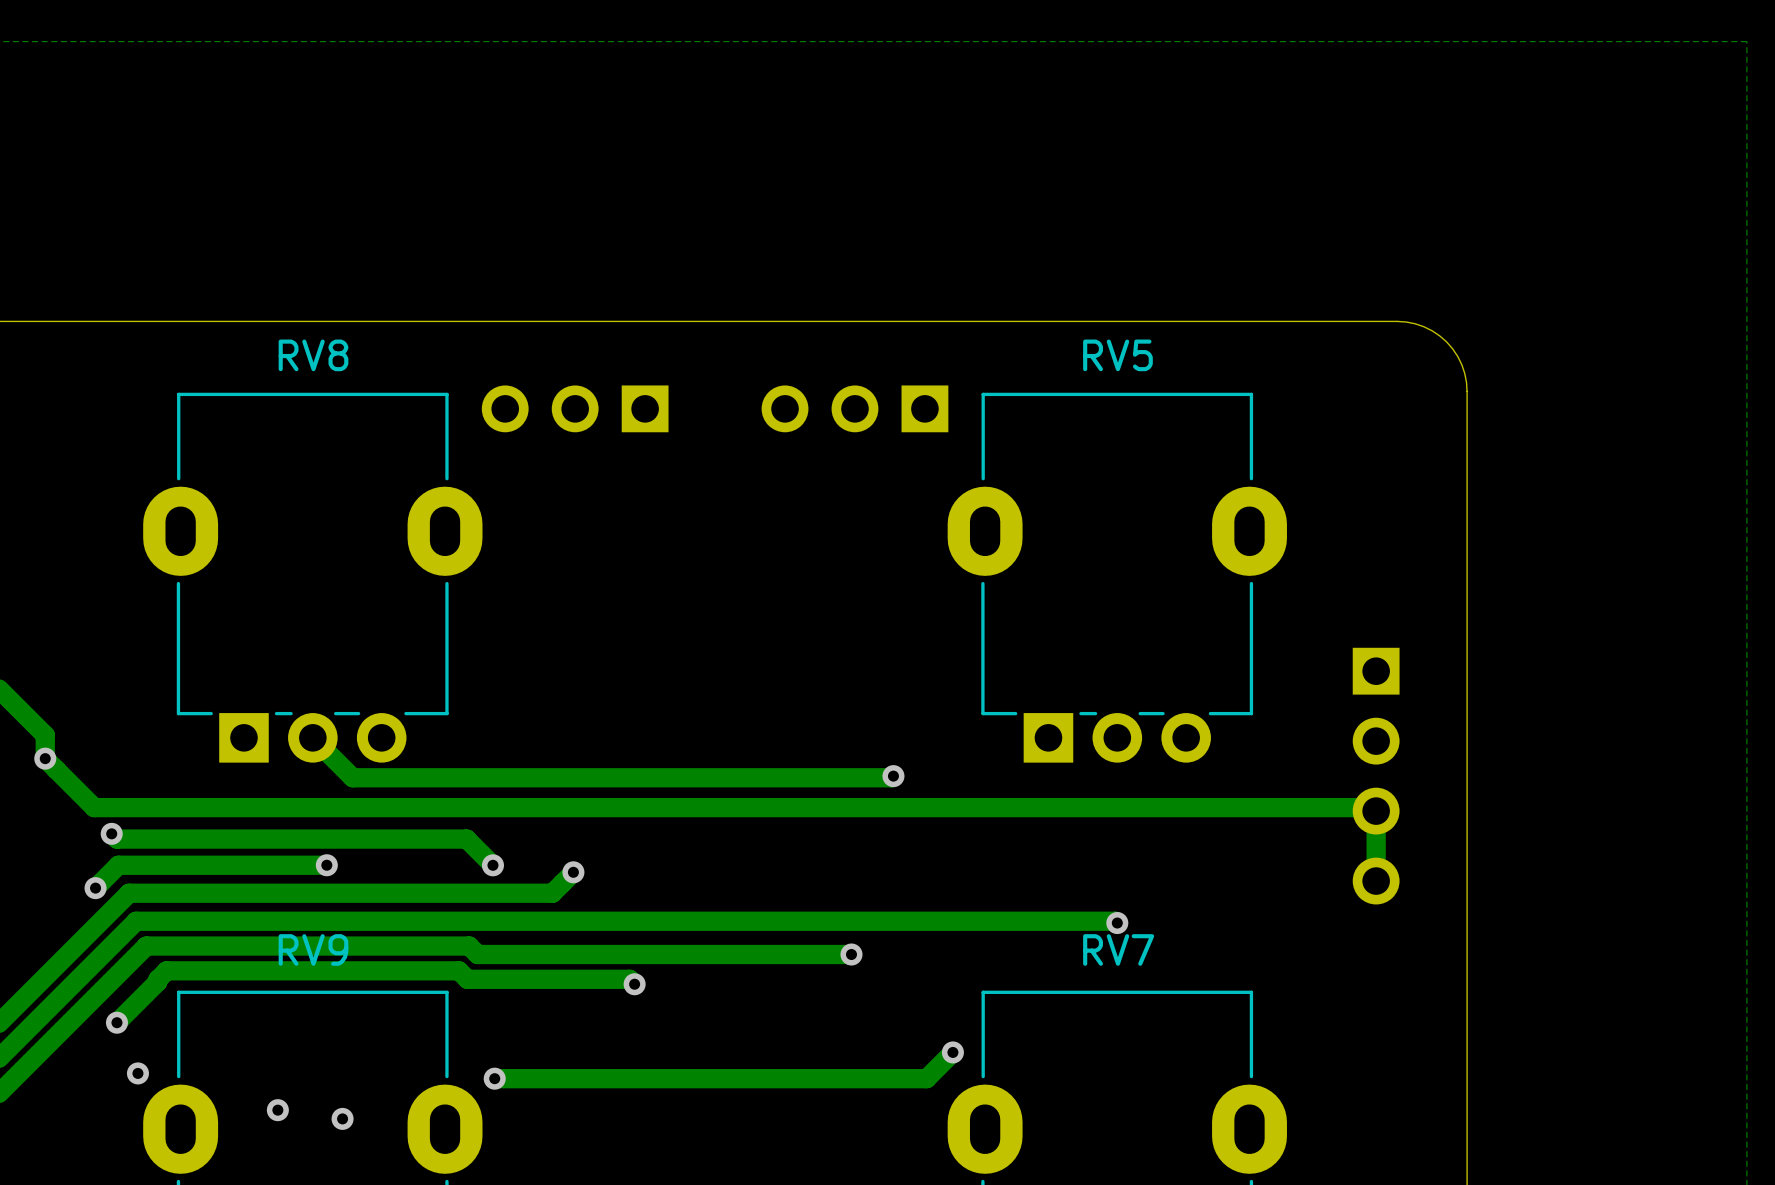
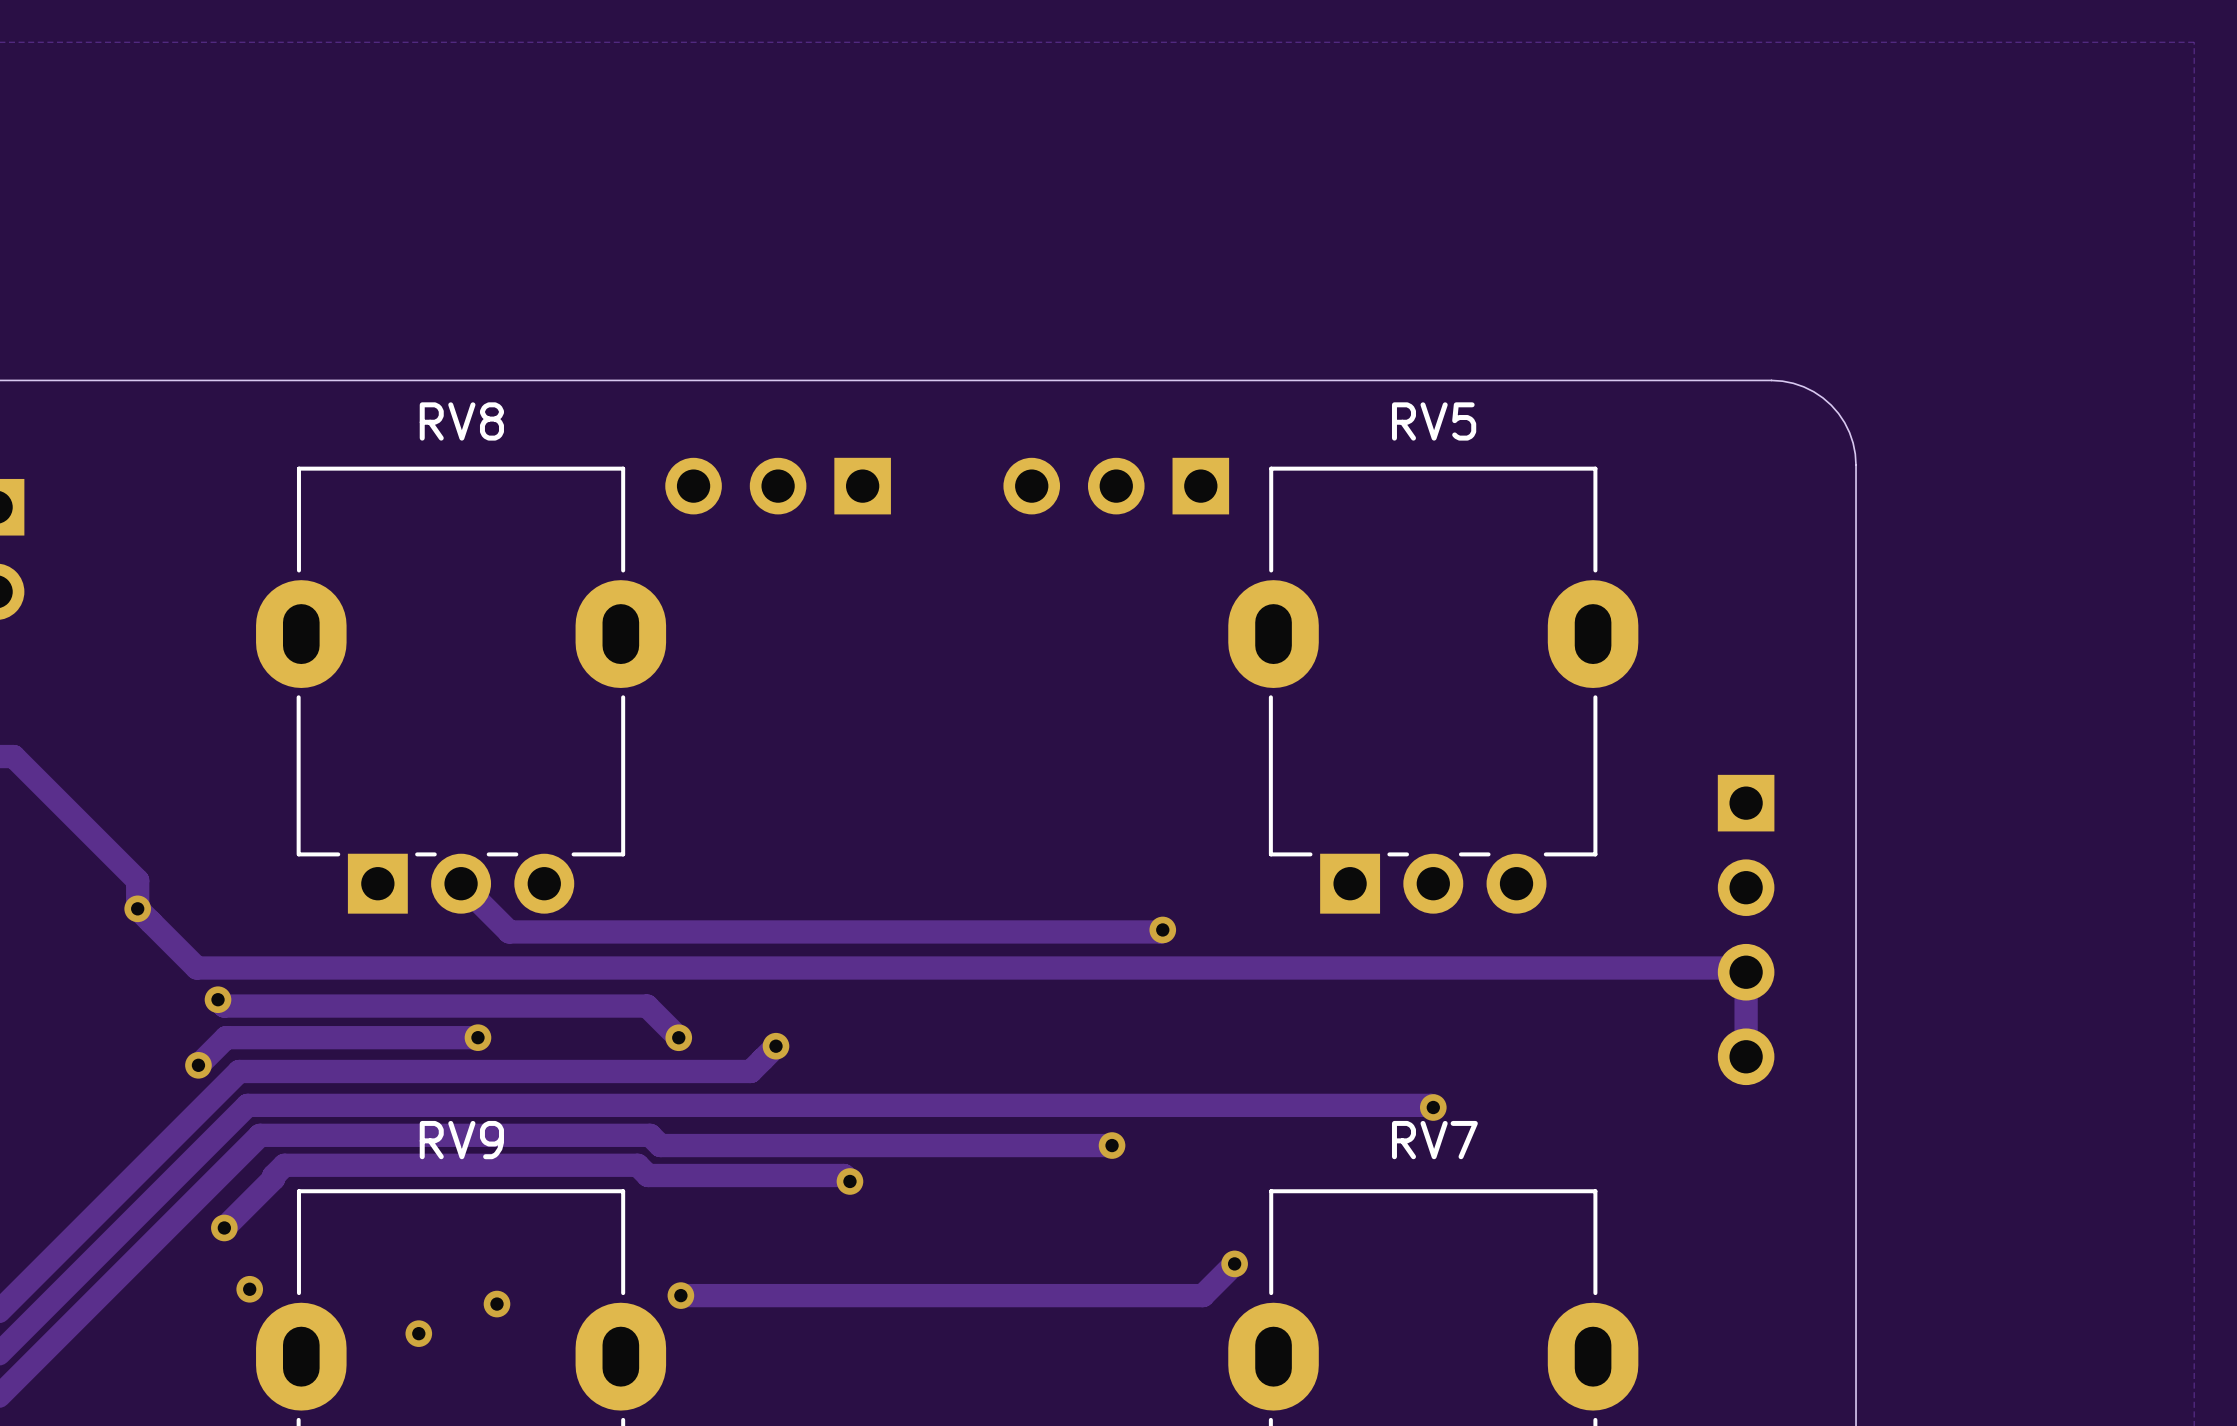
via position: (342, 1118) -> (497, 1304)

